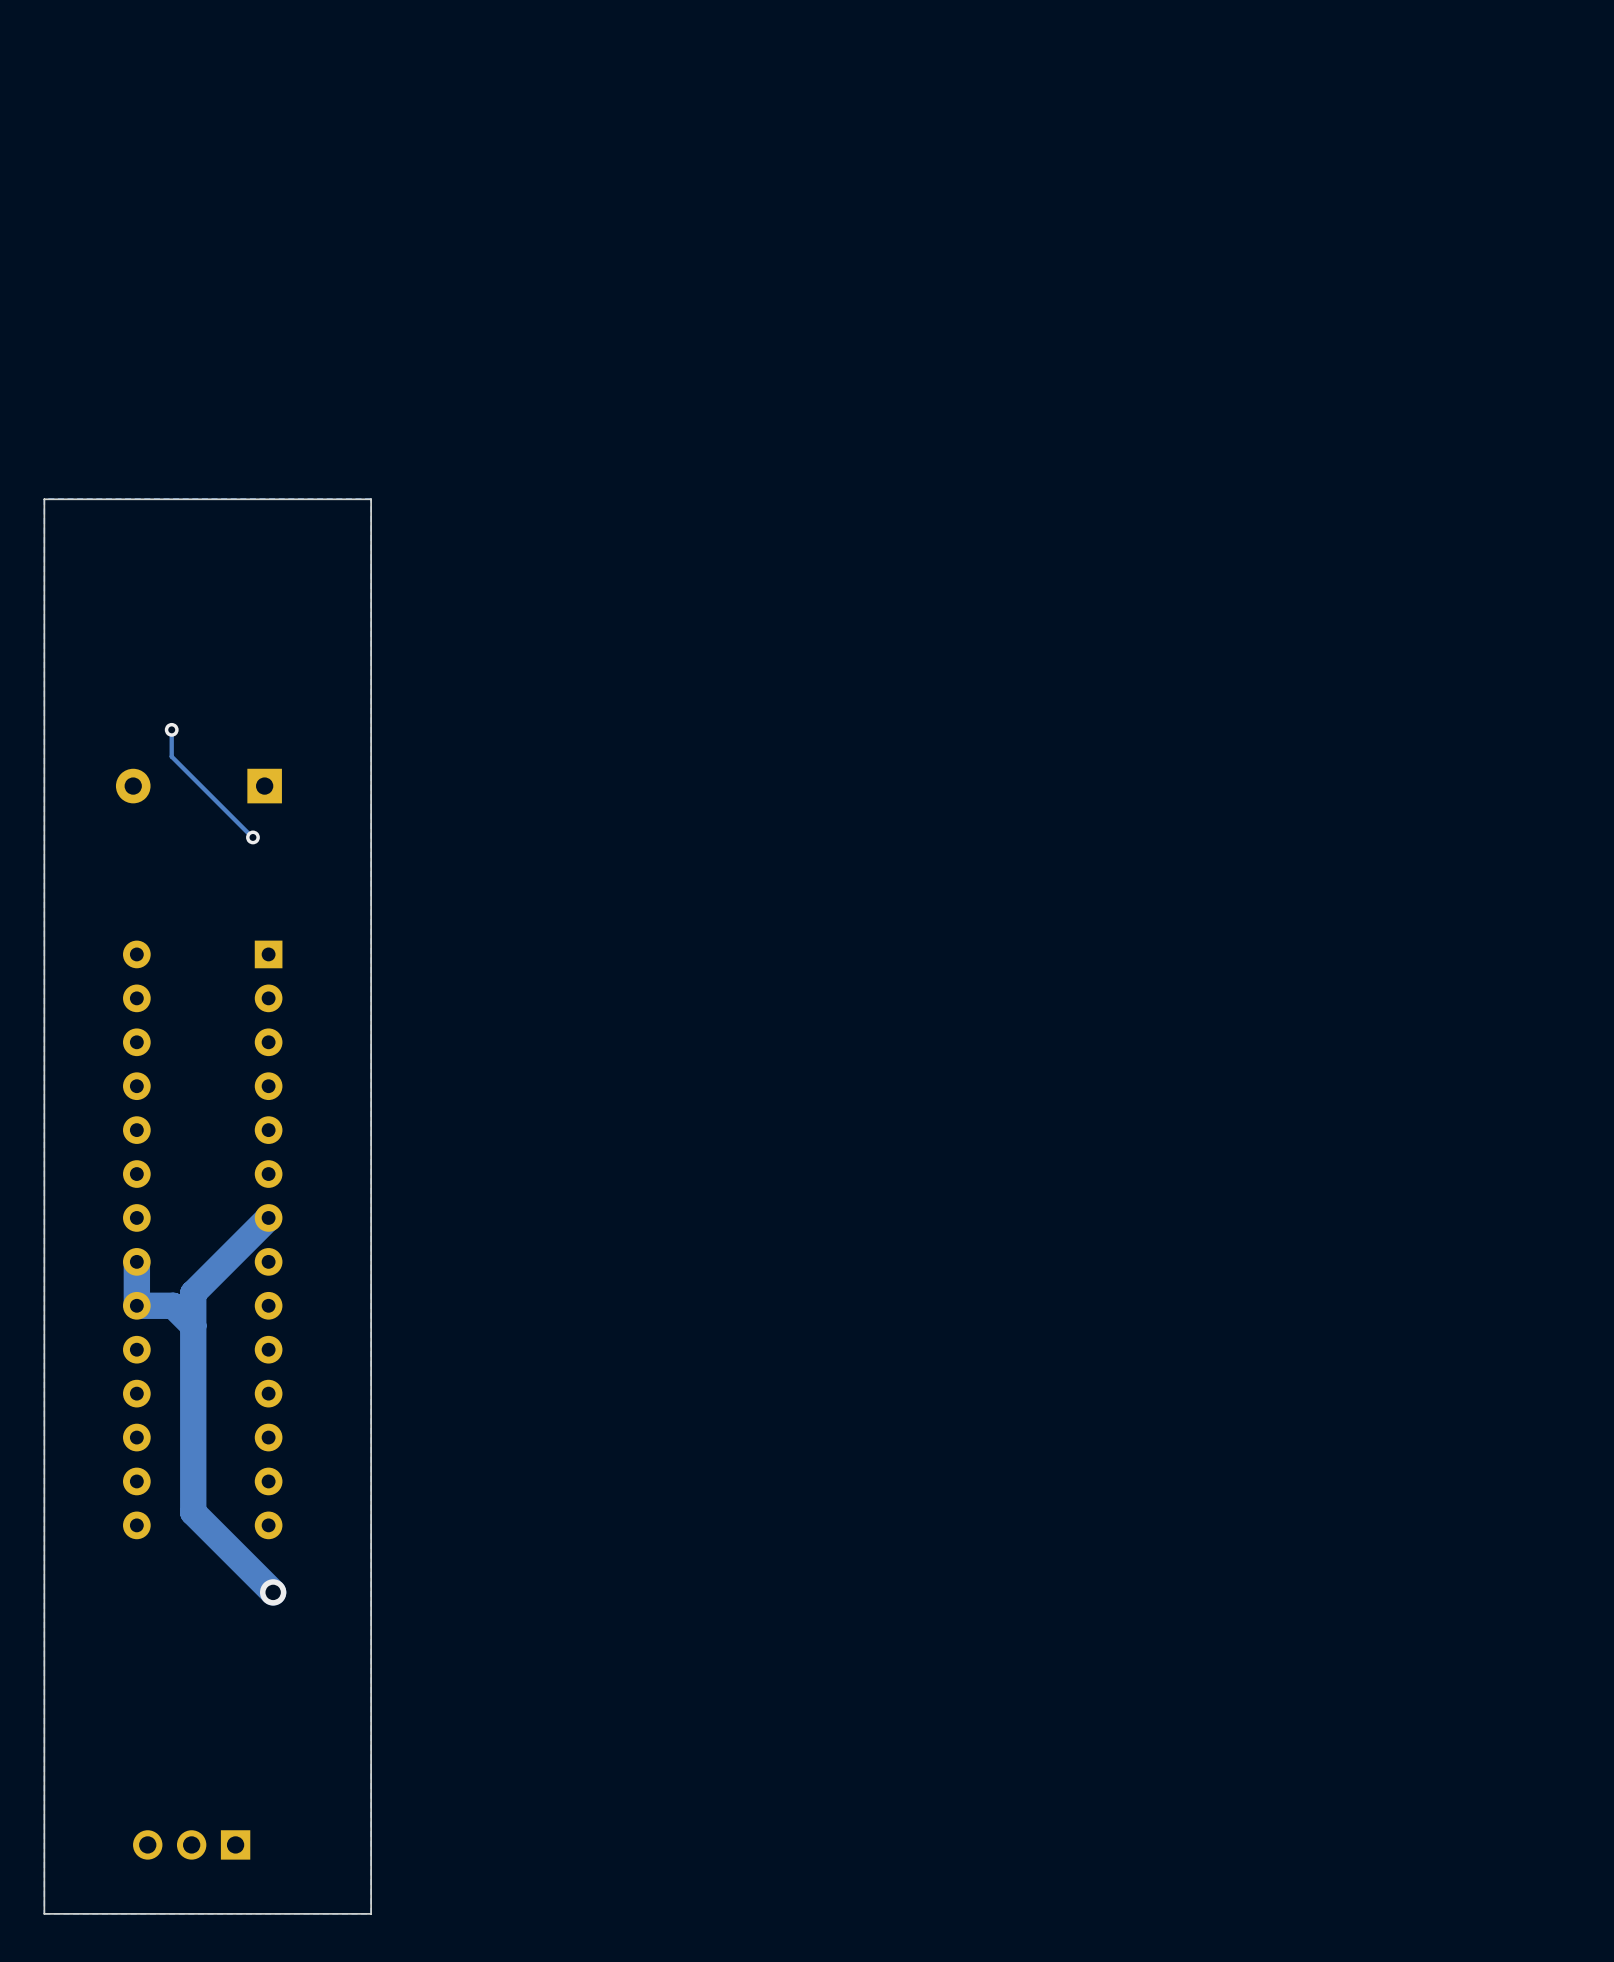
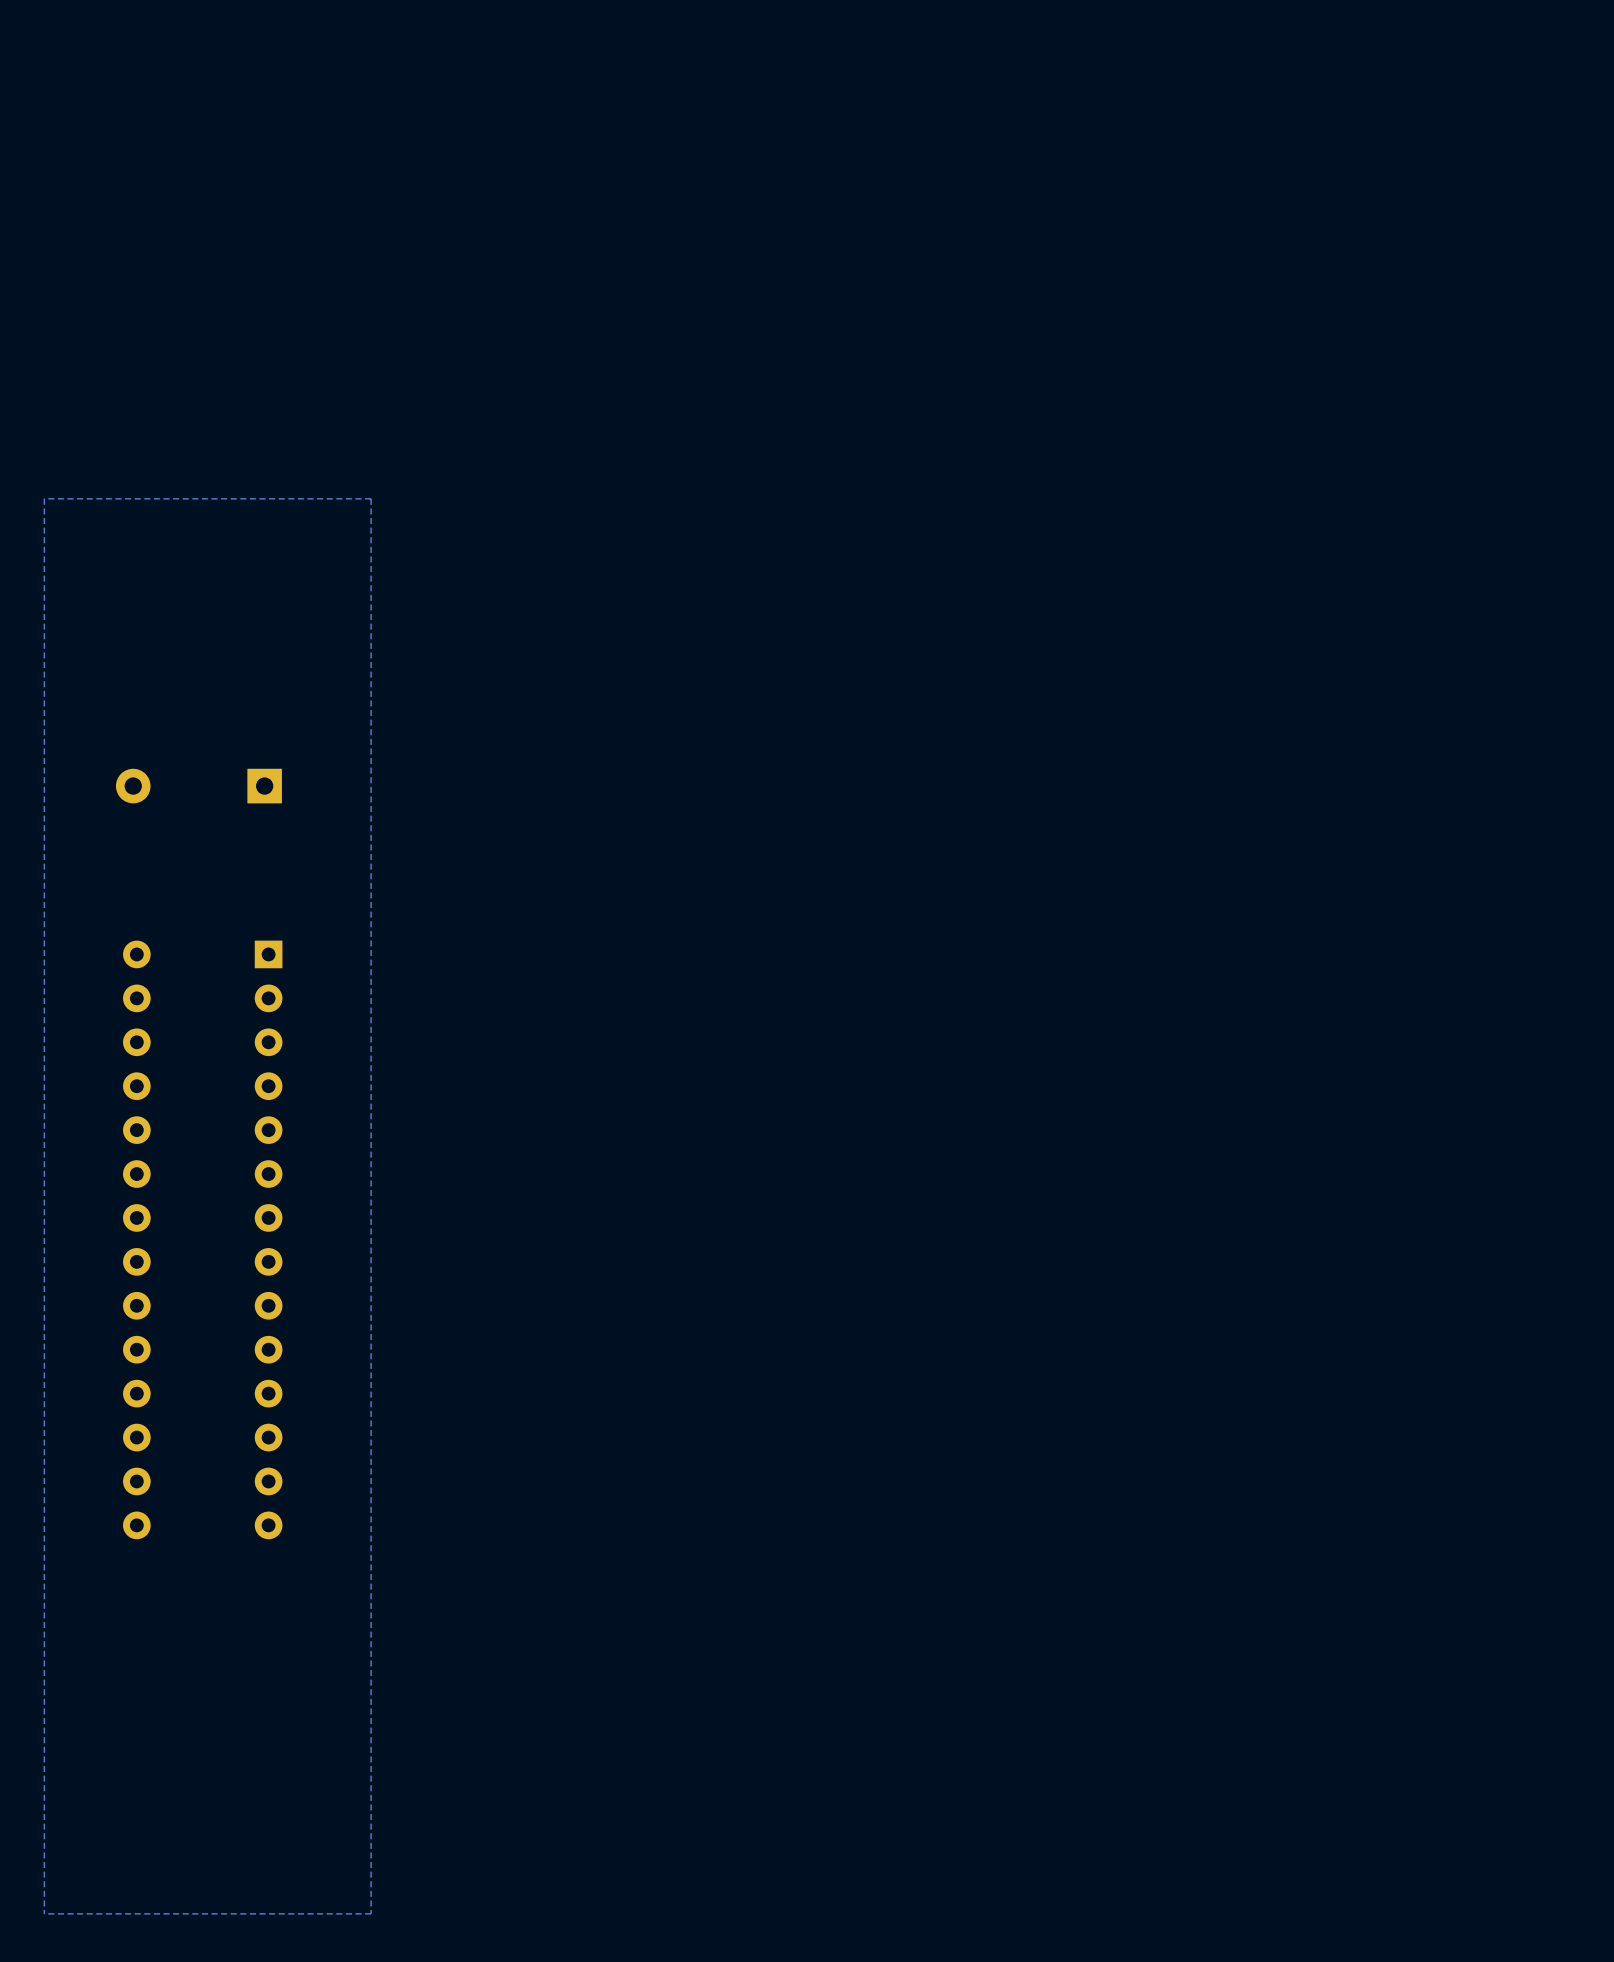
board edge: (371, 499) (44, 499) (44, 1913) (371, 1913) (371, 499) -> none
track: (171, 729) (171, 756) (252, 837) -> none
via: (171, 729) -> none
via: (252, 837) -> none
track: (268, 1217) (193, 1293) (193, 1512) (273, 1592) -> none
track: (136, 1261) (136, 1305) (173, 1305) (193, 1325) -> none
via: (273, 1592) -> none
part: (191, 1844) -> none

